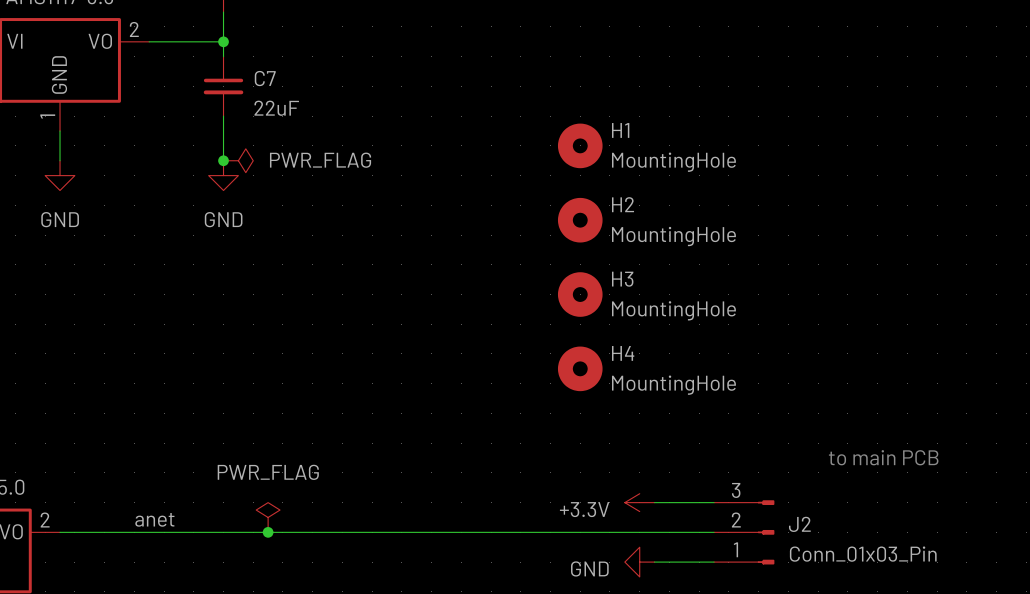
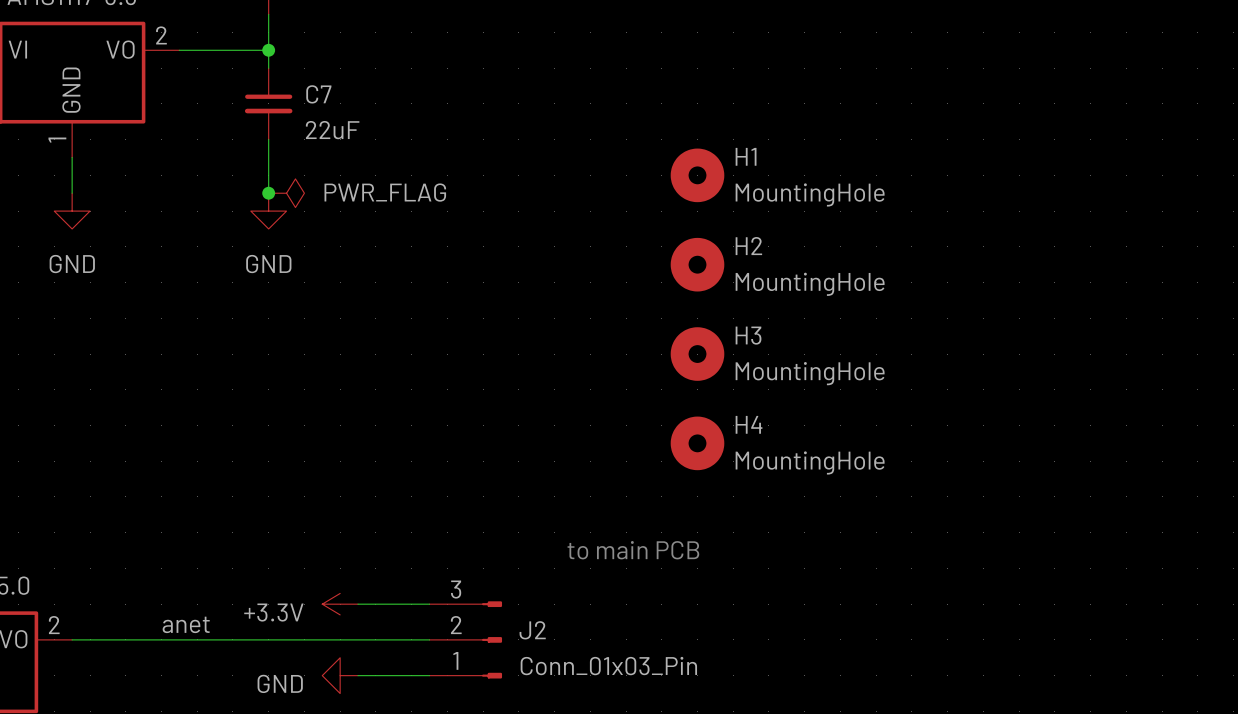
text: none -> to main PCB (633, 550)
text: to main PCB (883, 457) -> none
power symbol: none -> +3.3V (340, 604)
wire: none -> (358, 604) (429, 604)
power symbol: +3.3V (639, 502) -> none
wire: (654, 502) (714, 502) -> none
power symbol: PWR_FLAG (268, 517) -> none
junction: (268, 532) -> none
wire: (357, 532) (714, 532) -> none
J2 position: (744, 532) -> (465, 639)
power symbol: none -> GND (340, 675)
wire: none -> (358, 675) (429, 675)
power symbol: GND (639, 562) -> none
wire: (654, 562) (714, 562) -> none

